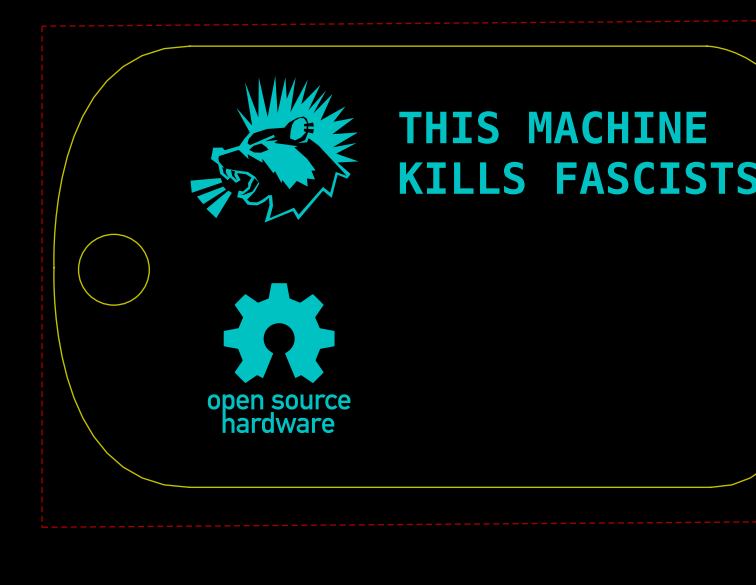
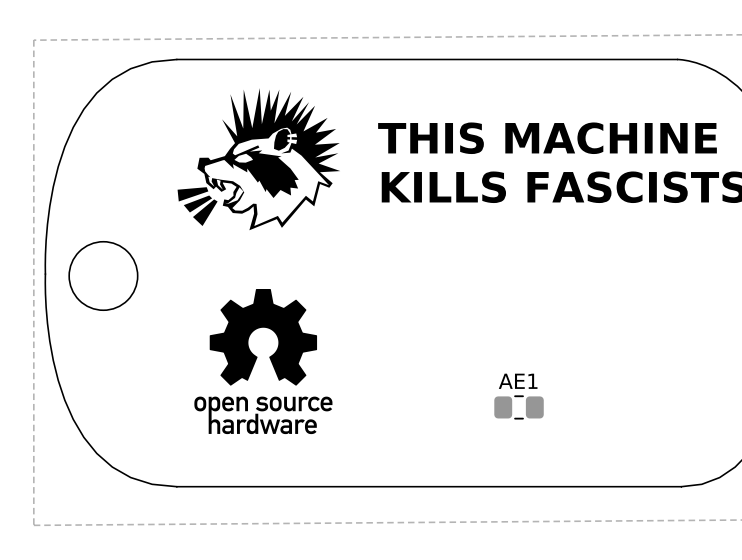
AE1: none -> (519, 407)

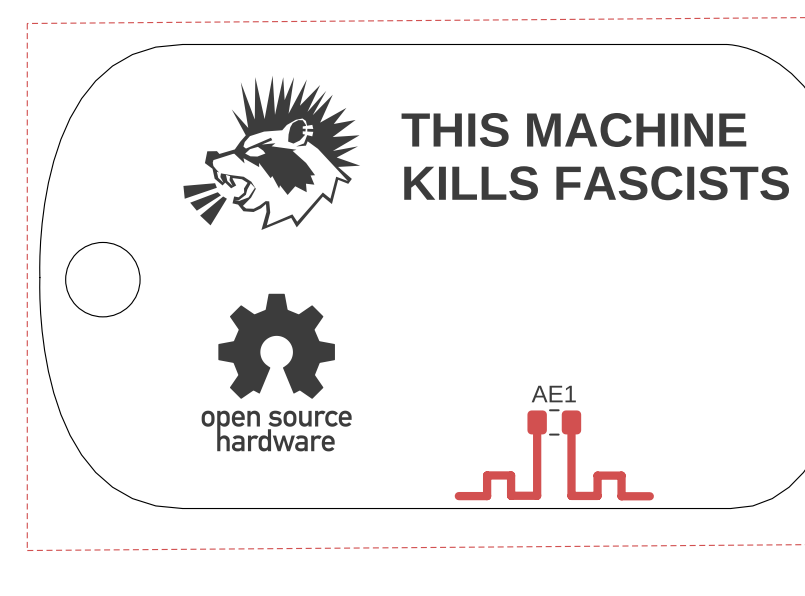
track: none -> (537, 422) (537, 495) (511, 495) (511, 475) (487, 475) (487, 496) (458, 496)
track: none -> (571, 422) (571, 495) (597, 495) (597, 475) (621, 475) (621, 496) (649, 496)

